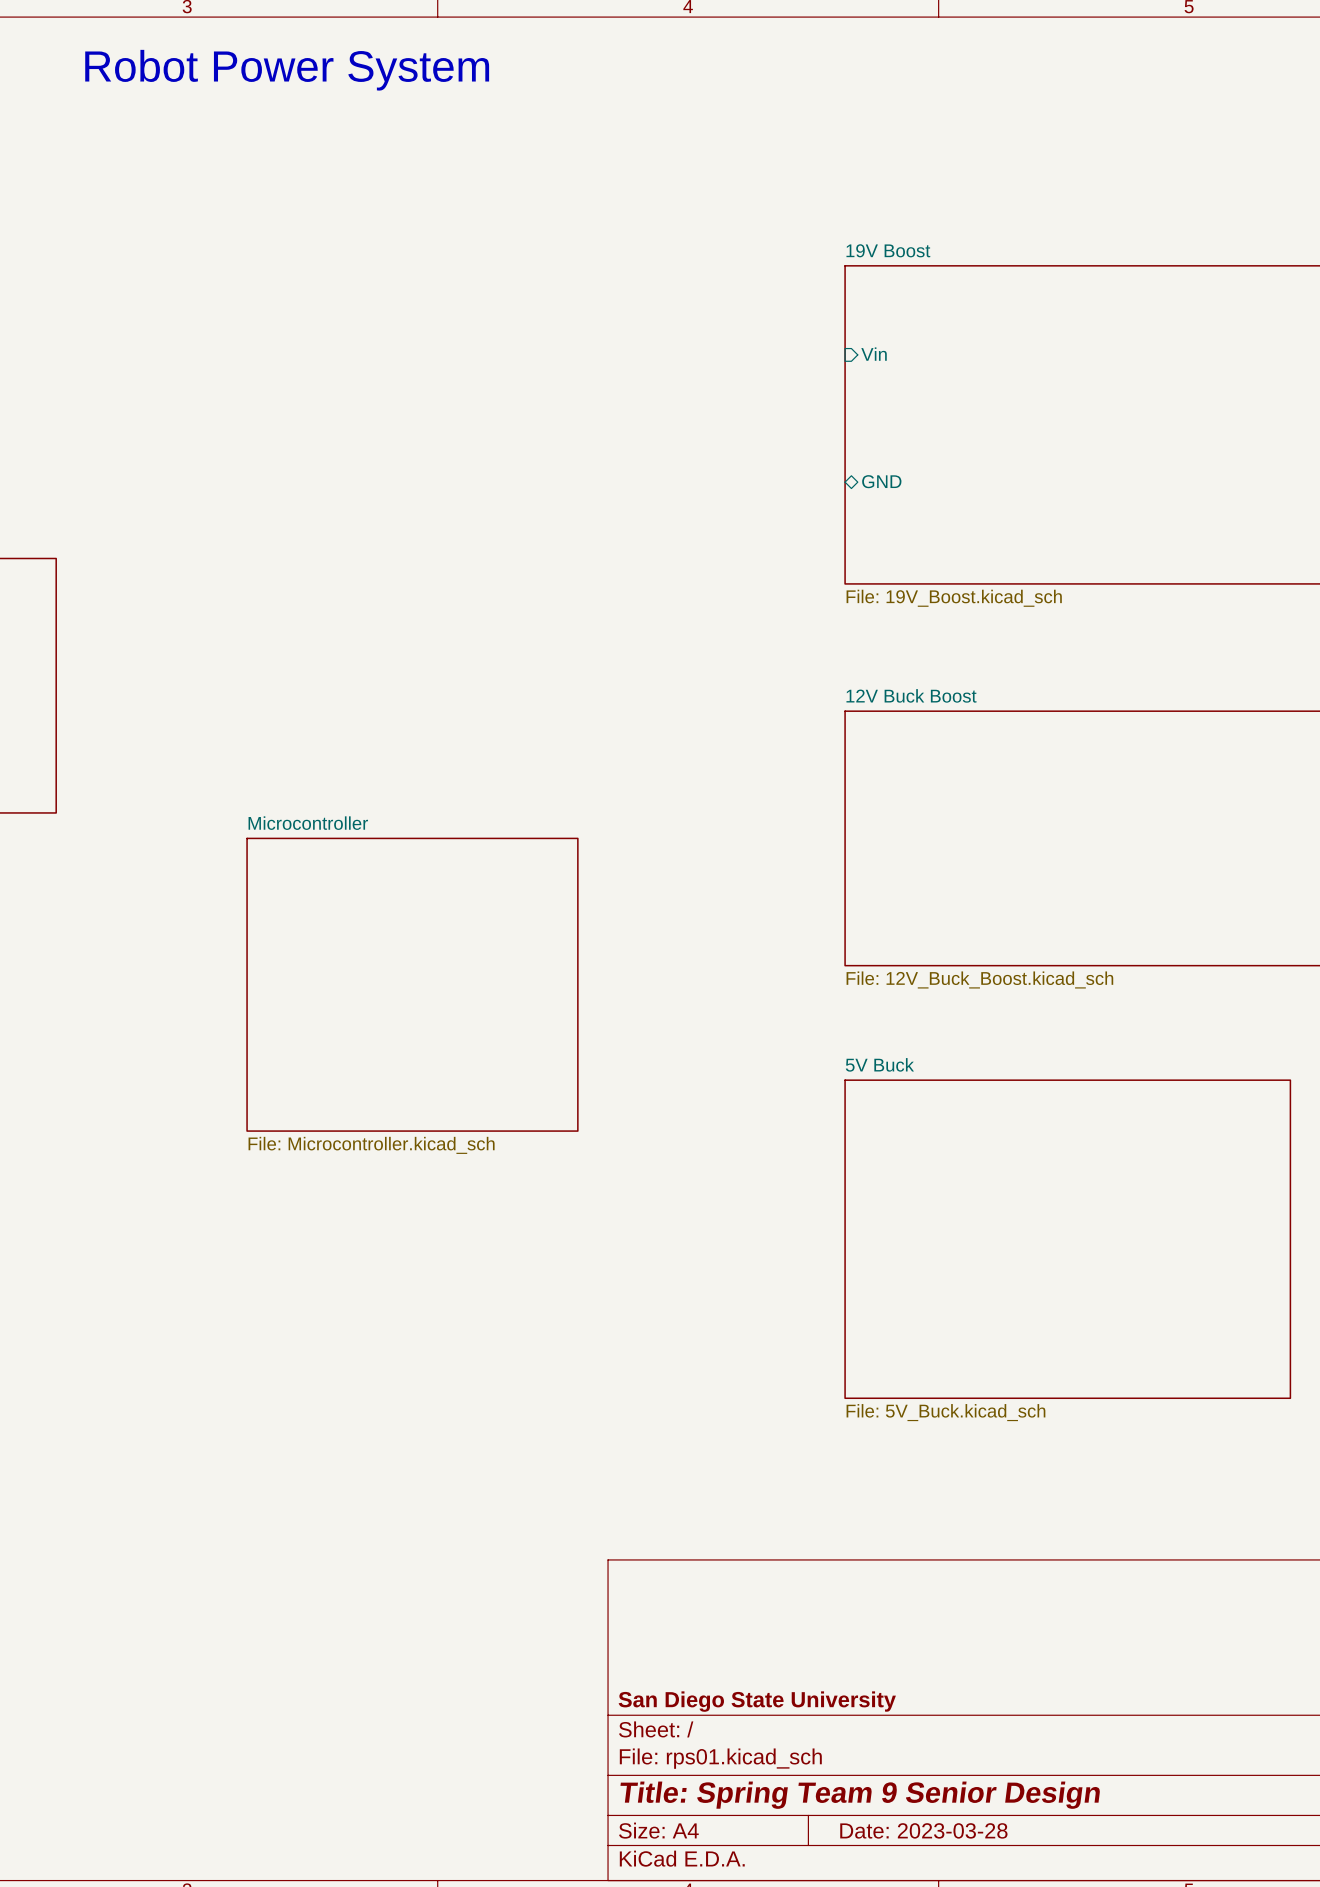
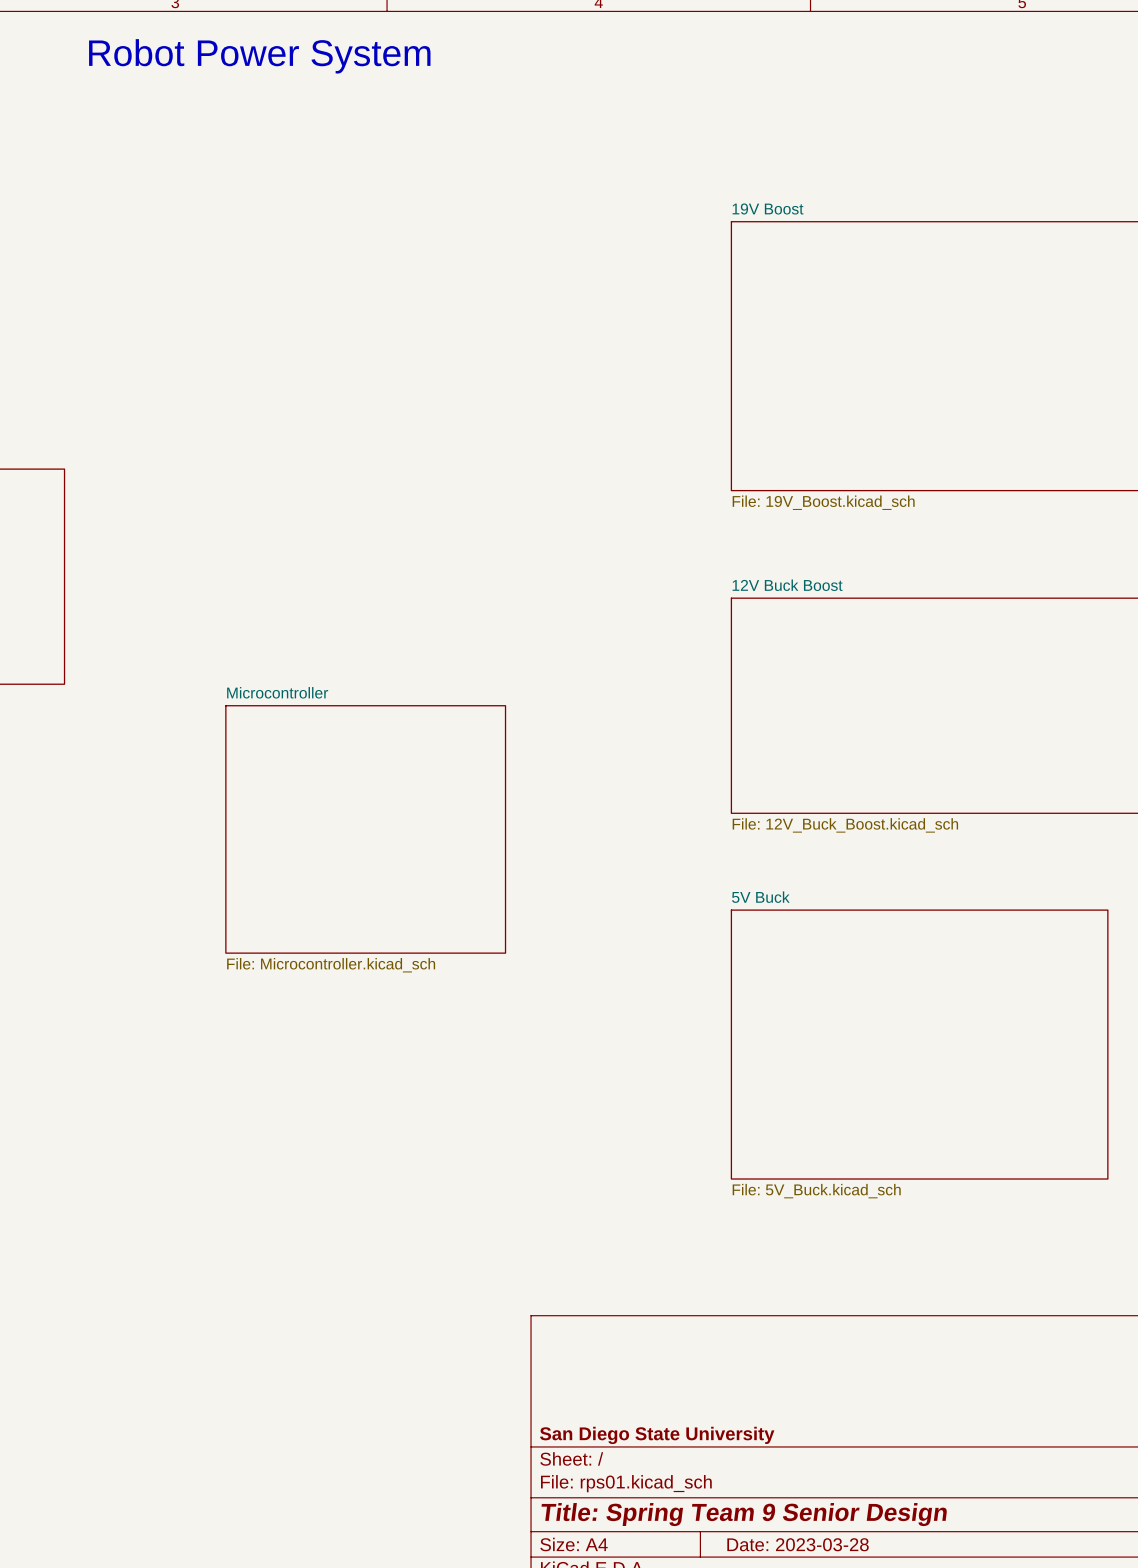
sheet pin: Vin (874, 354) -> none
sheet pin: GND (881, 481) -> none

